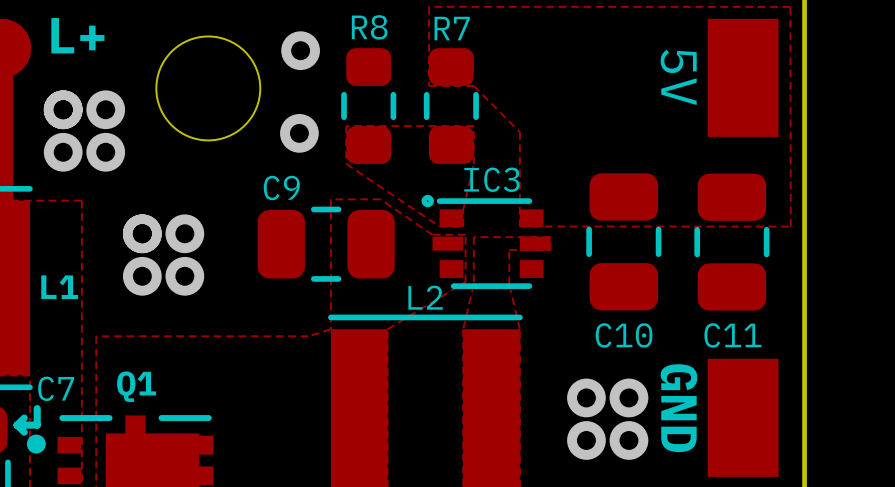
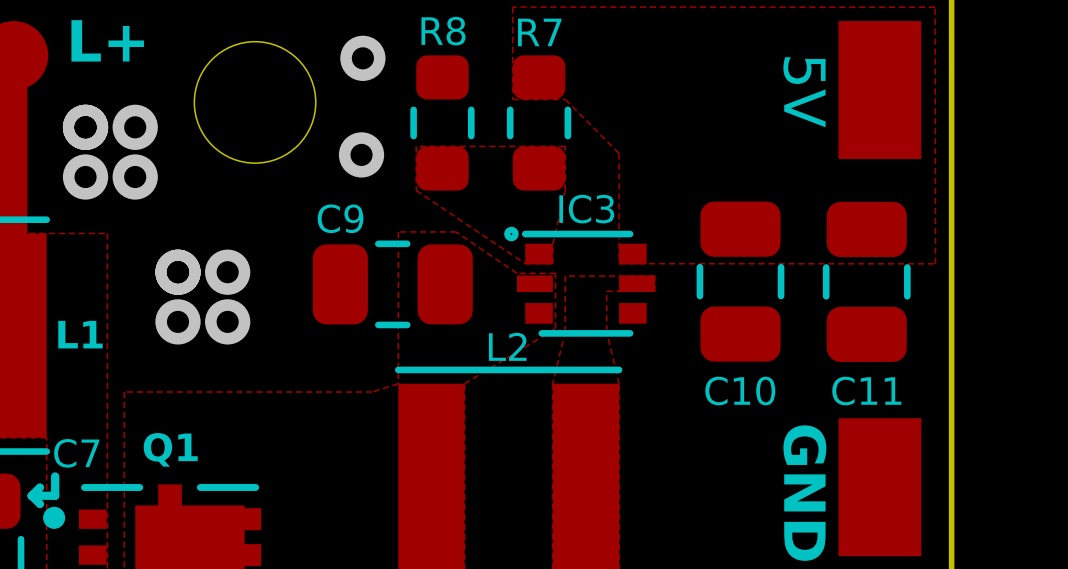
via: (586, 397) -> none
via: (628, 397) -> none
via: (586, 440) -> none
via: (628, 440) -> none

